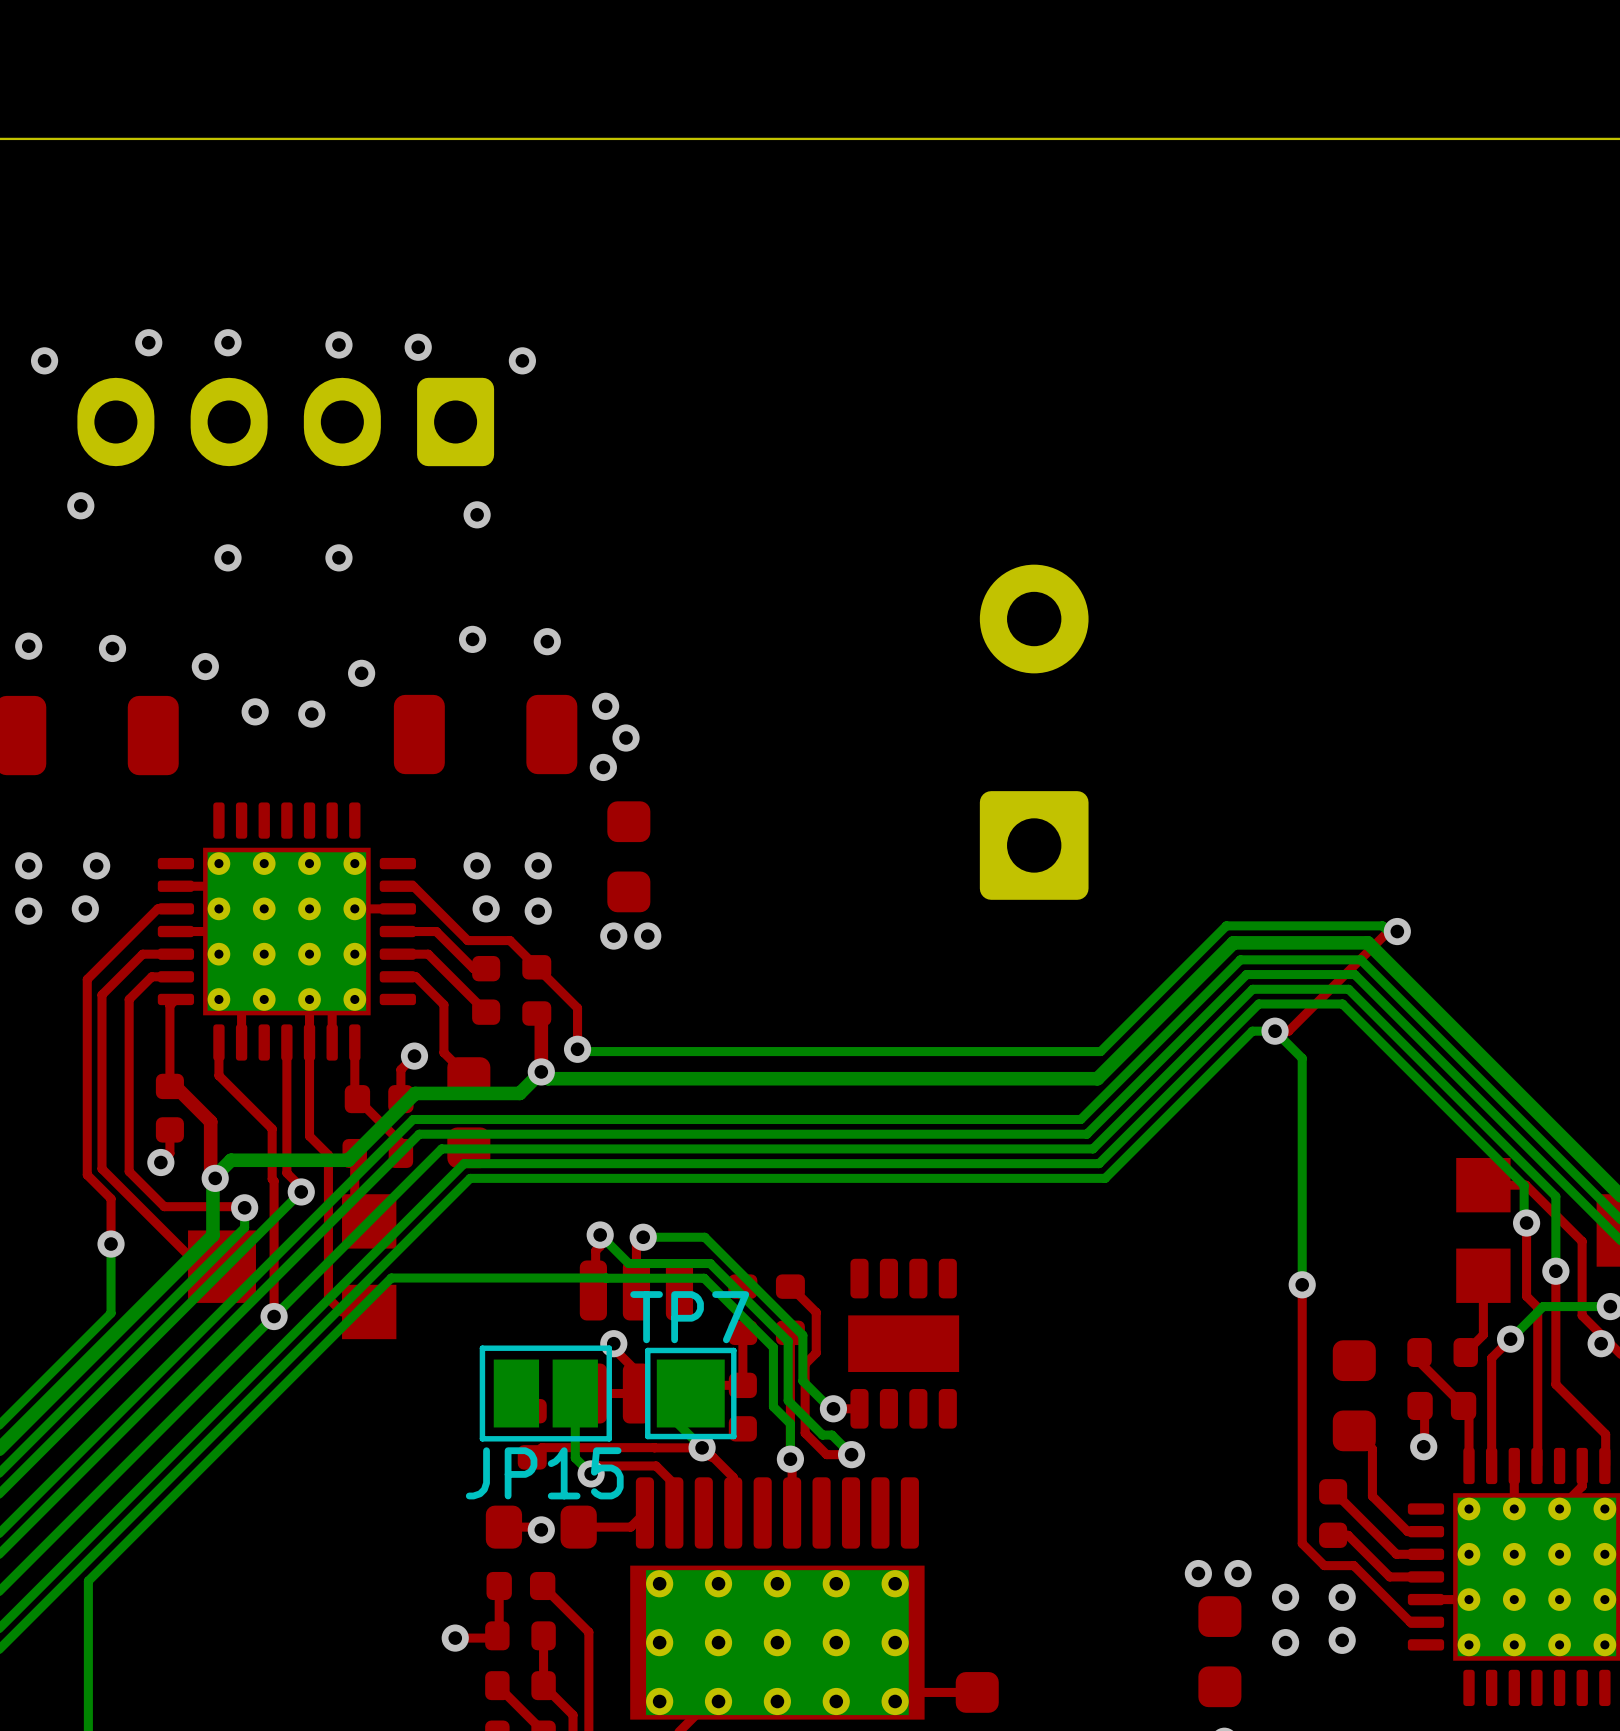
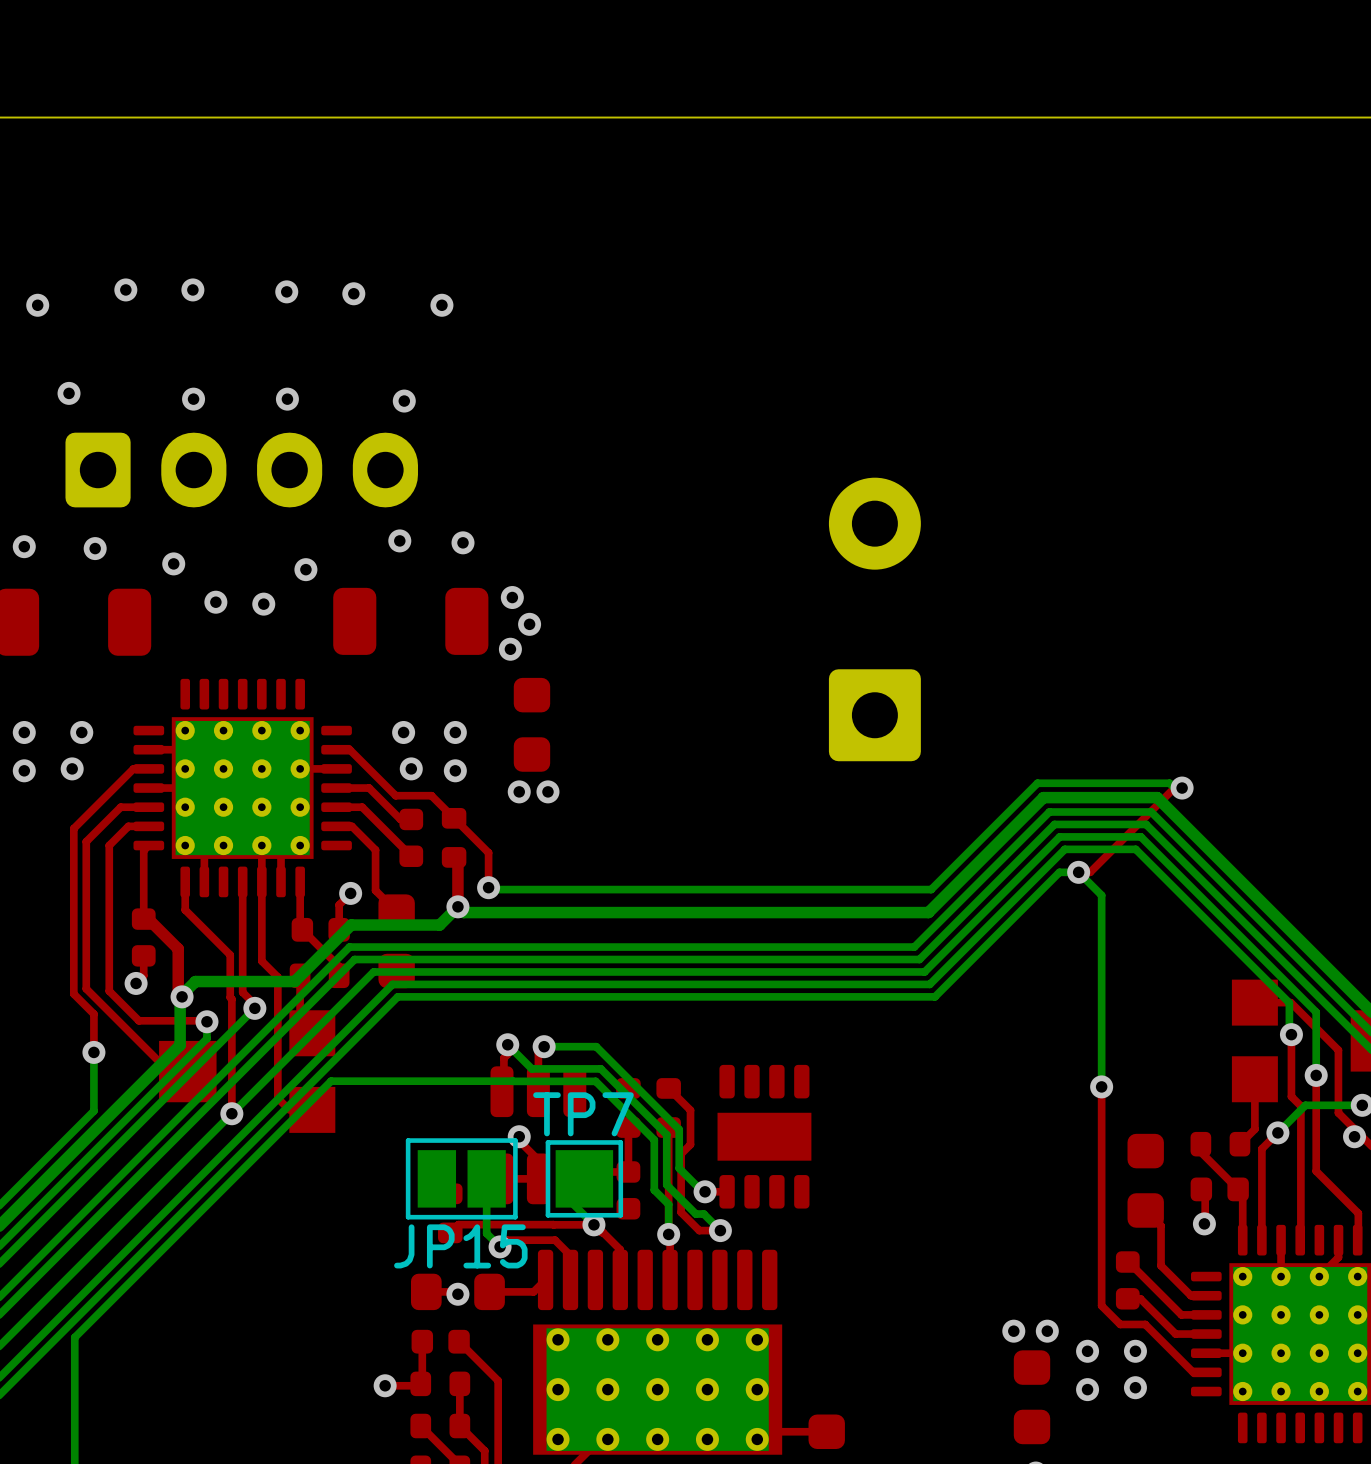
part rotation: 0° (285, 421) -> 180° (241, 470)
via: none -> (193, 399)
via: none -> (287, 399)
via position: (80, 505) -> (69, 393)
via position: (477, 514) -> (404, 401)
via: (228, 557) -> none
via: (338, 557) -> none

